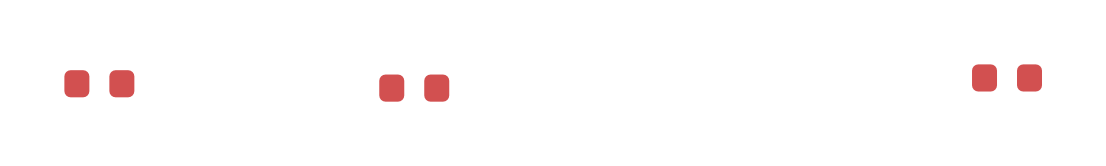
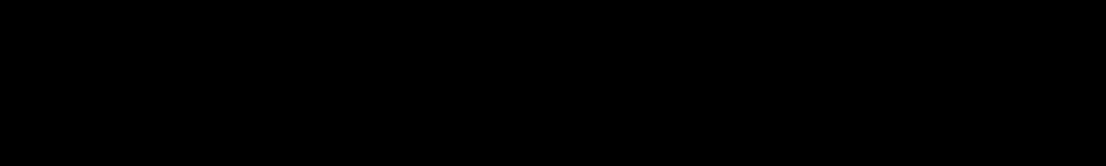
part: (1007, 77) -> none
part: (99, 83) -> none
part: (414, 88) -> none

